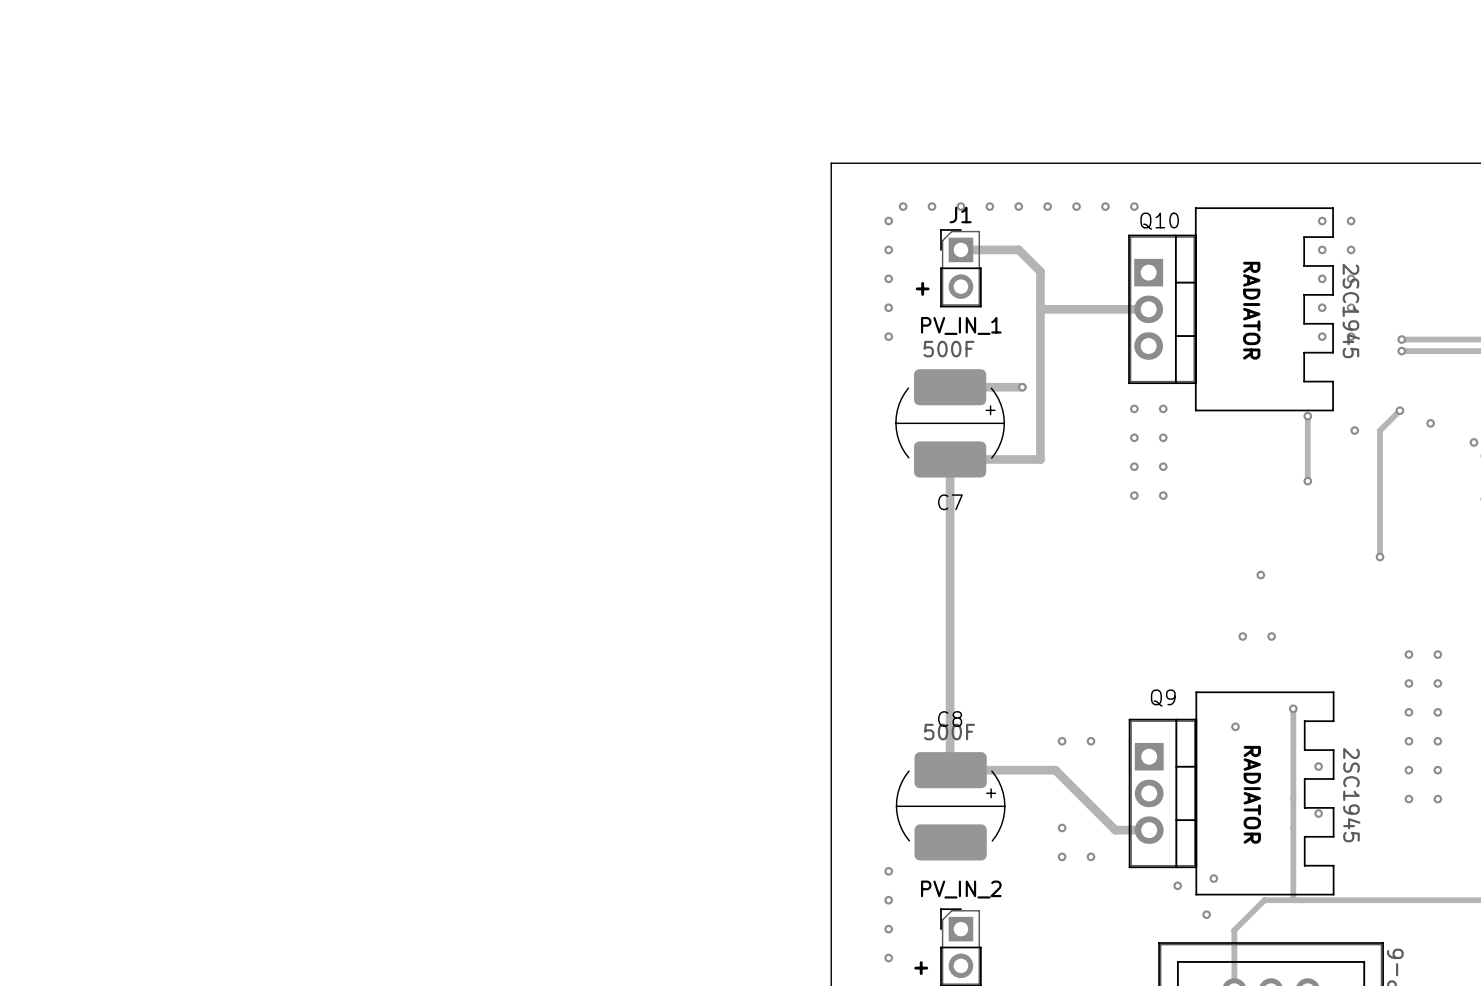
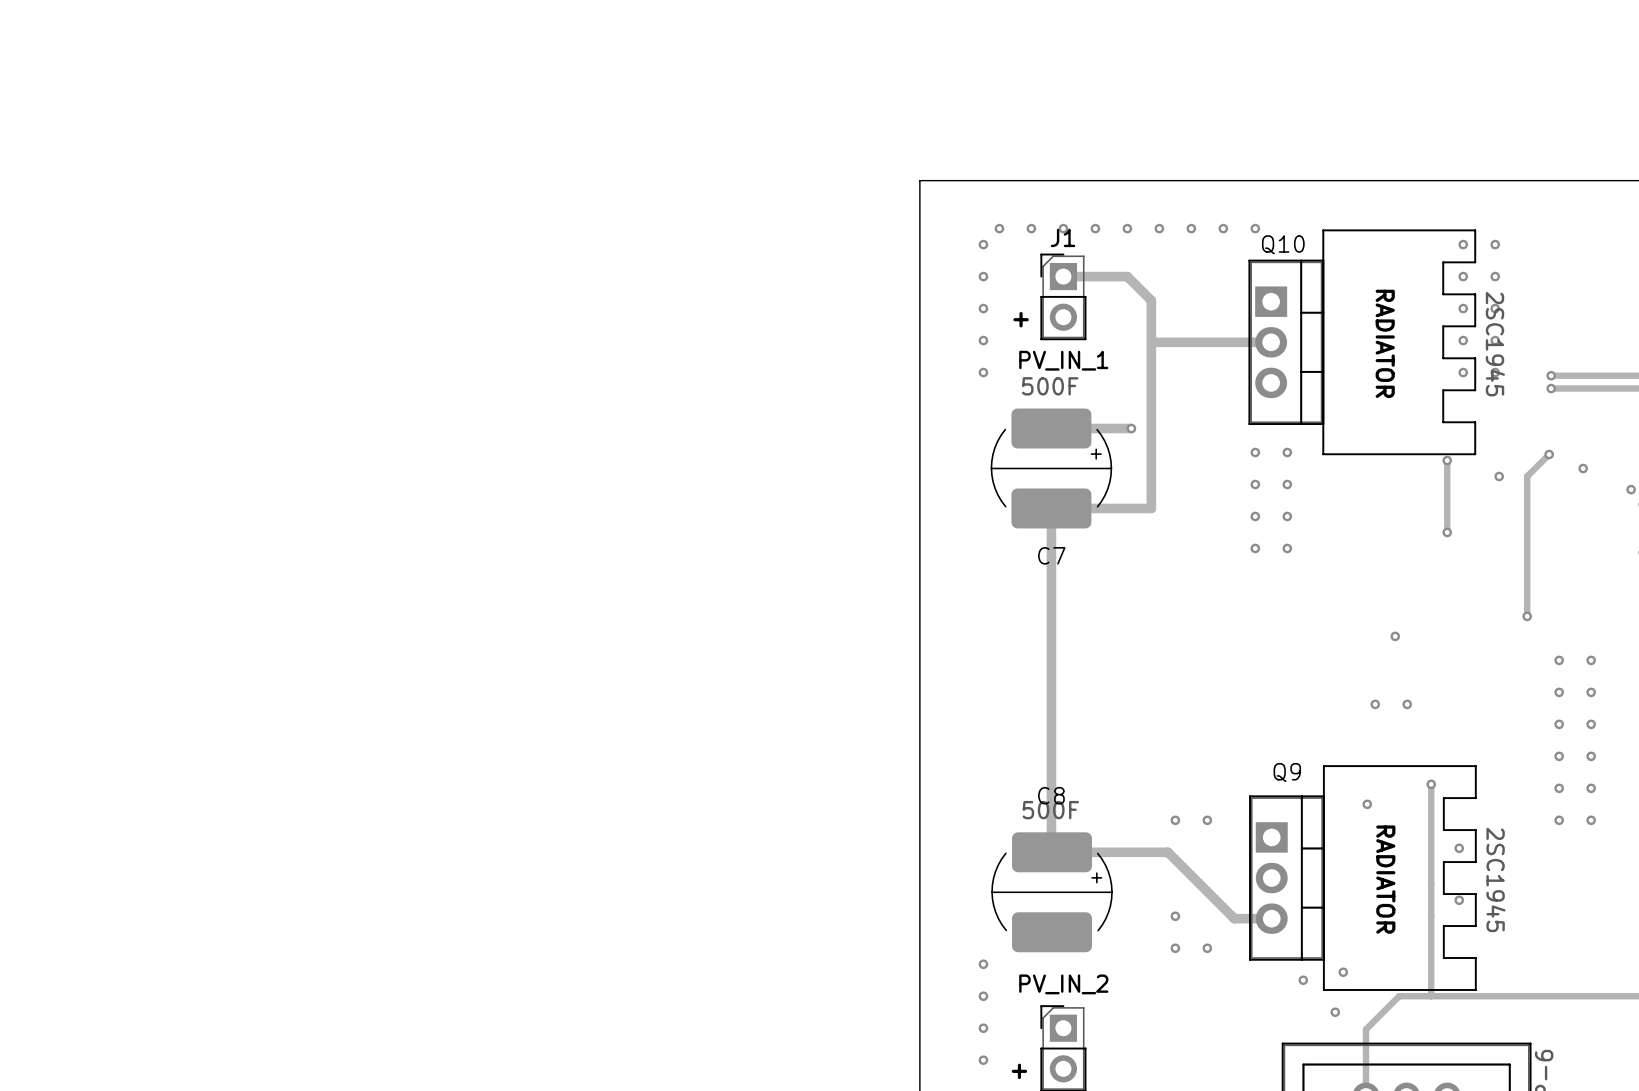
via: none -> (1559, 660)
via: none -> (1591, 660)
via: none -> (1559, 692)
via: none -> (1591, 692)
via: (1408, 770) -> none
via: (1437, 770) -> none
via: (1408, 799) -> none
via: (1437, 799) -> none

